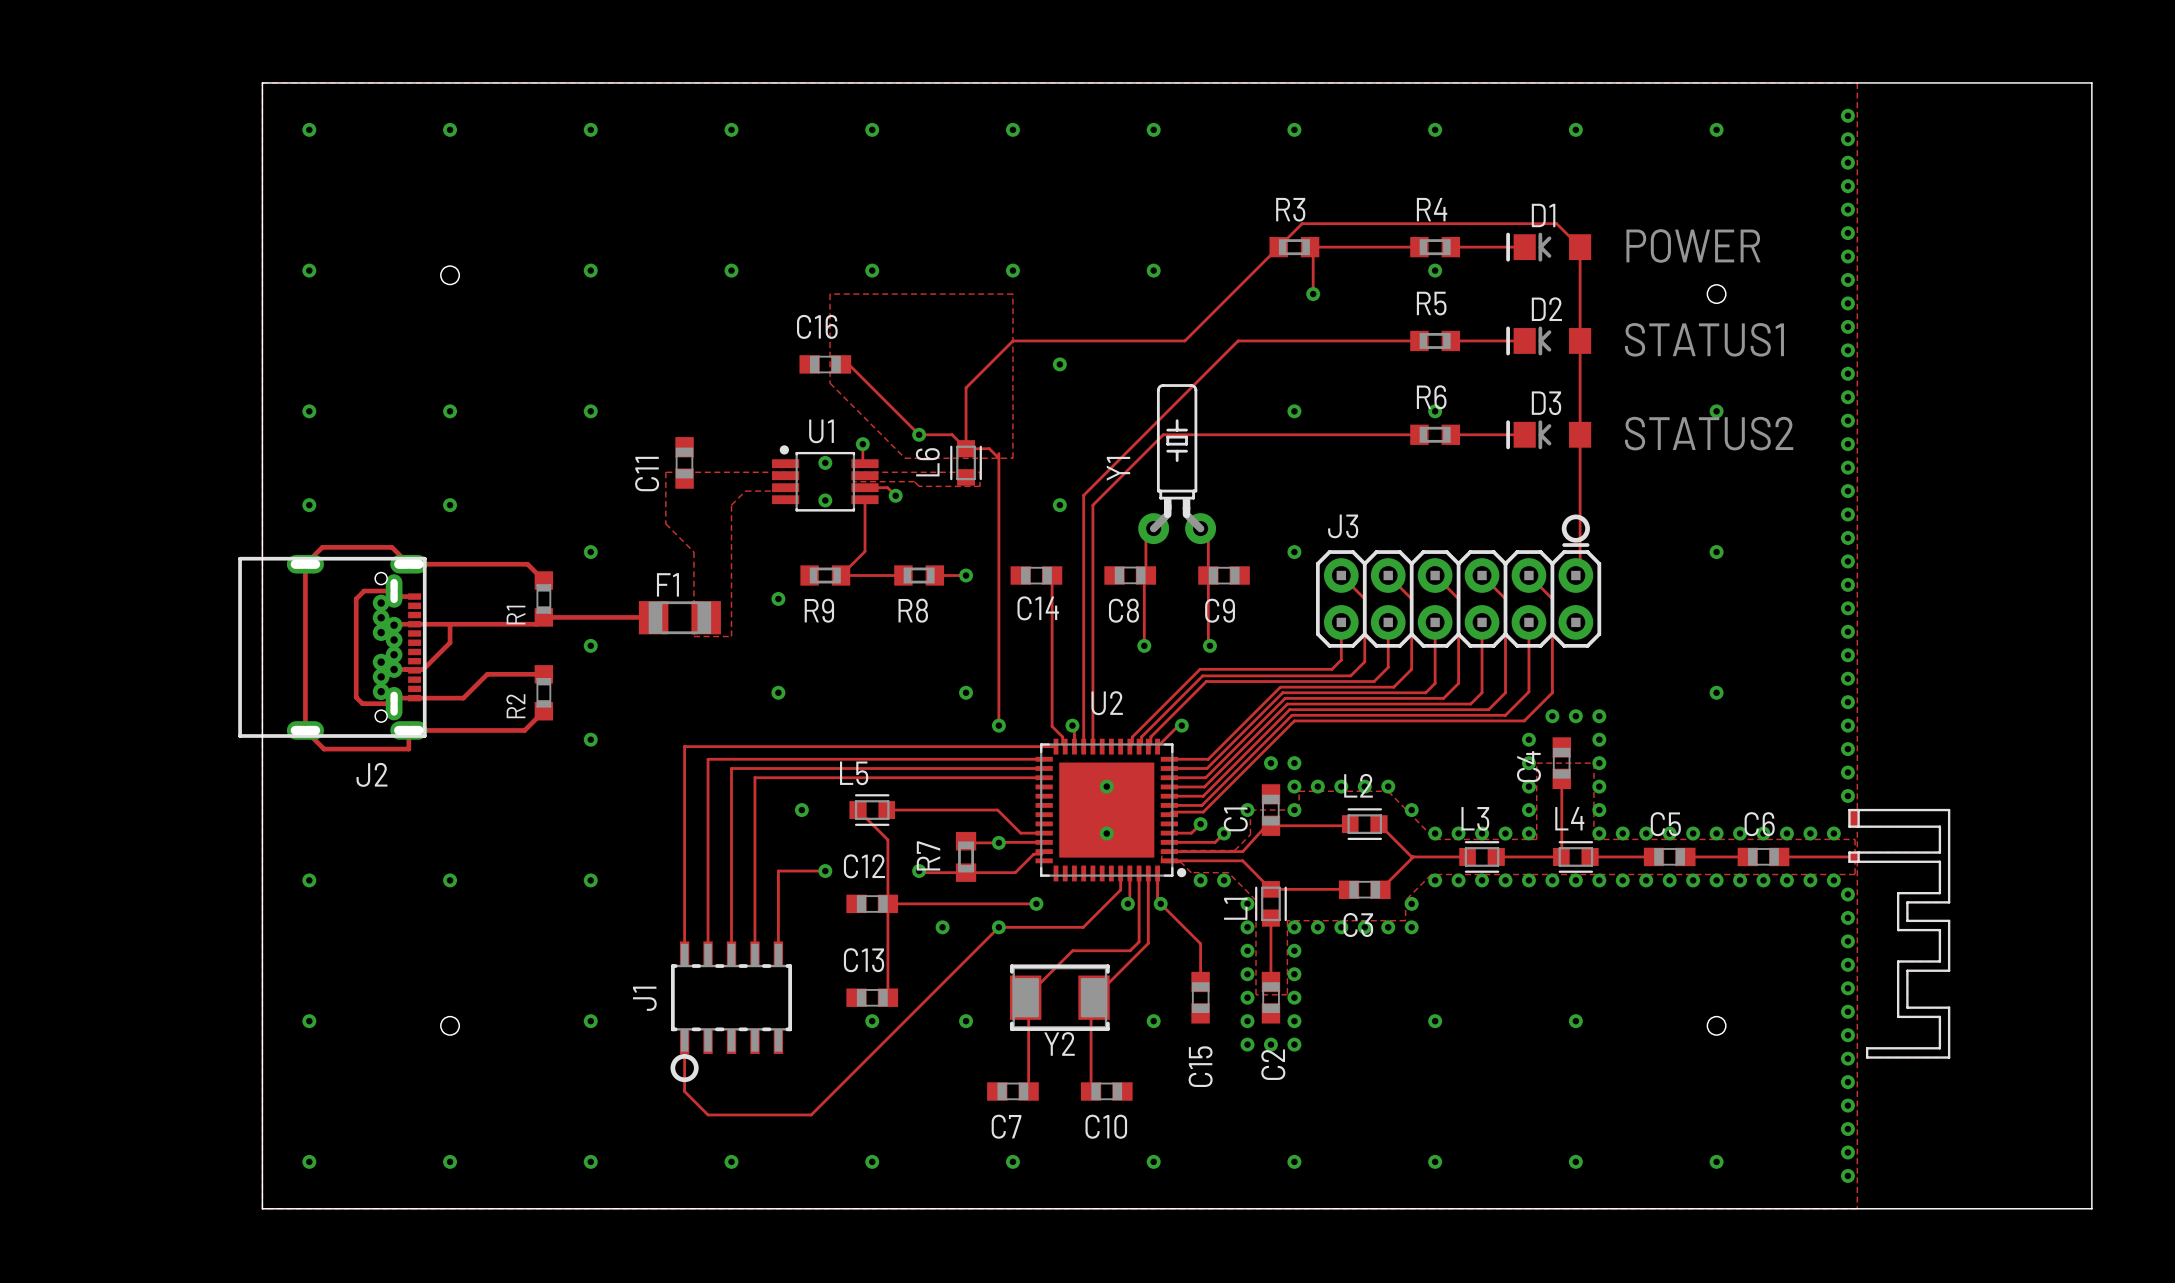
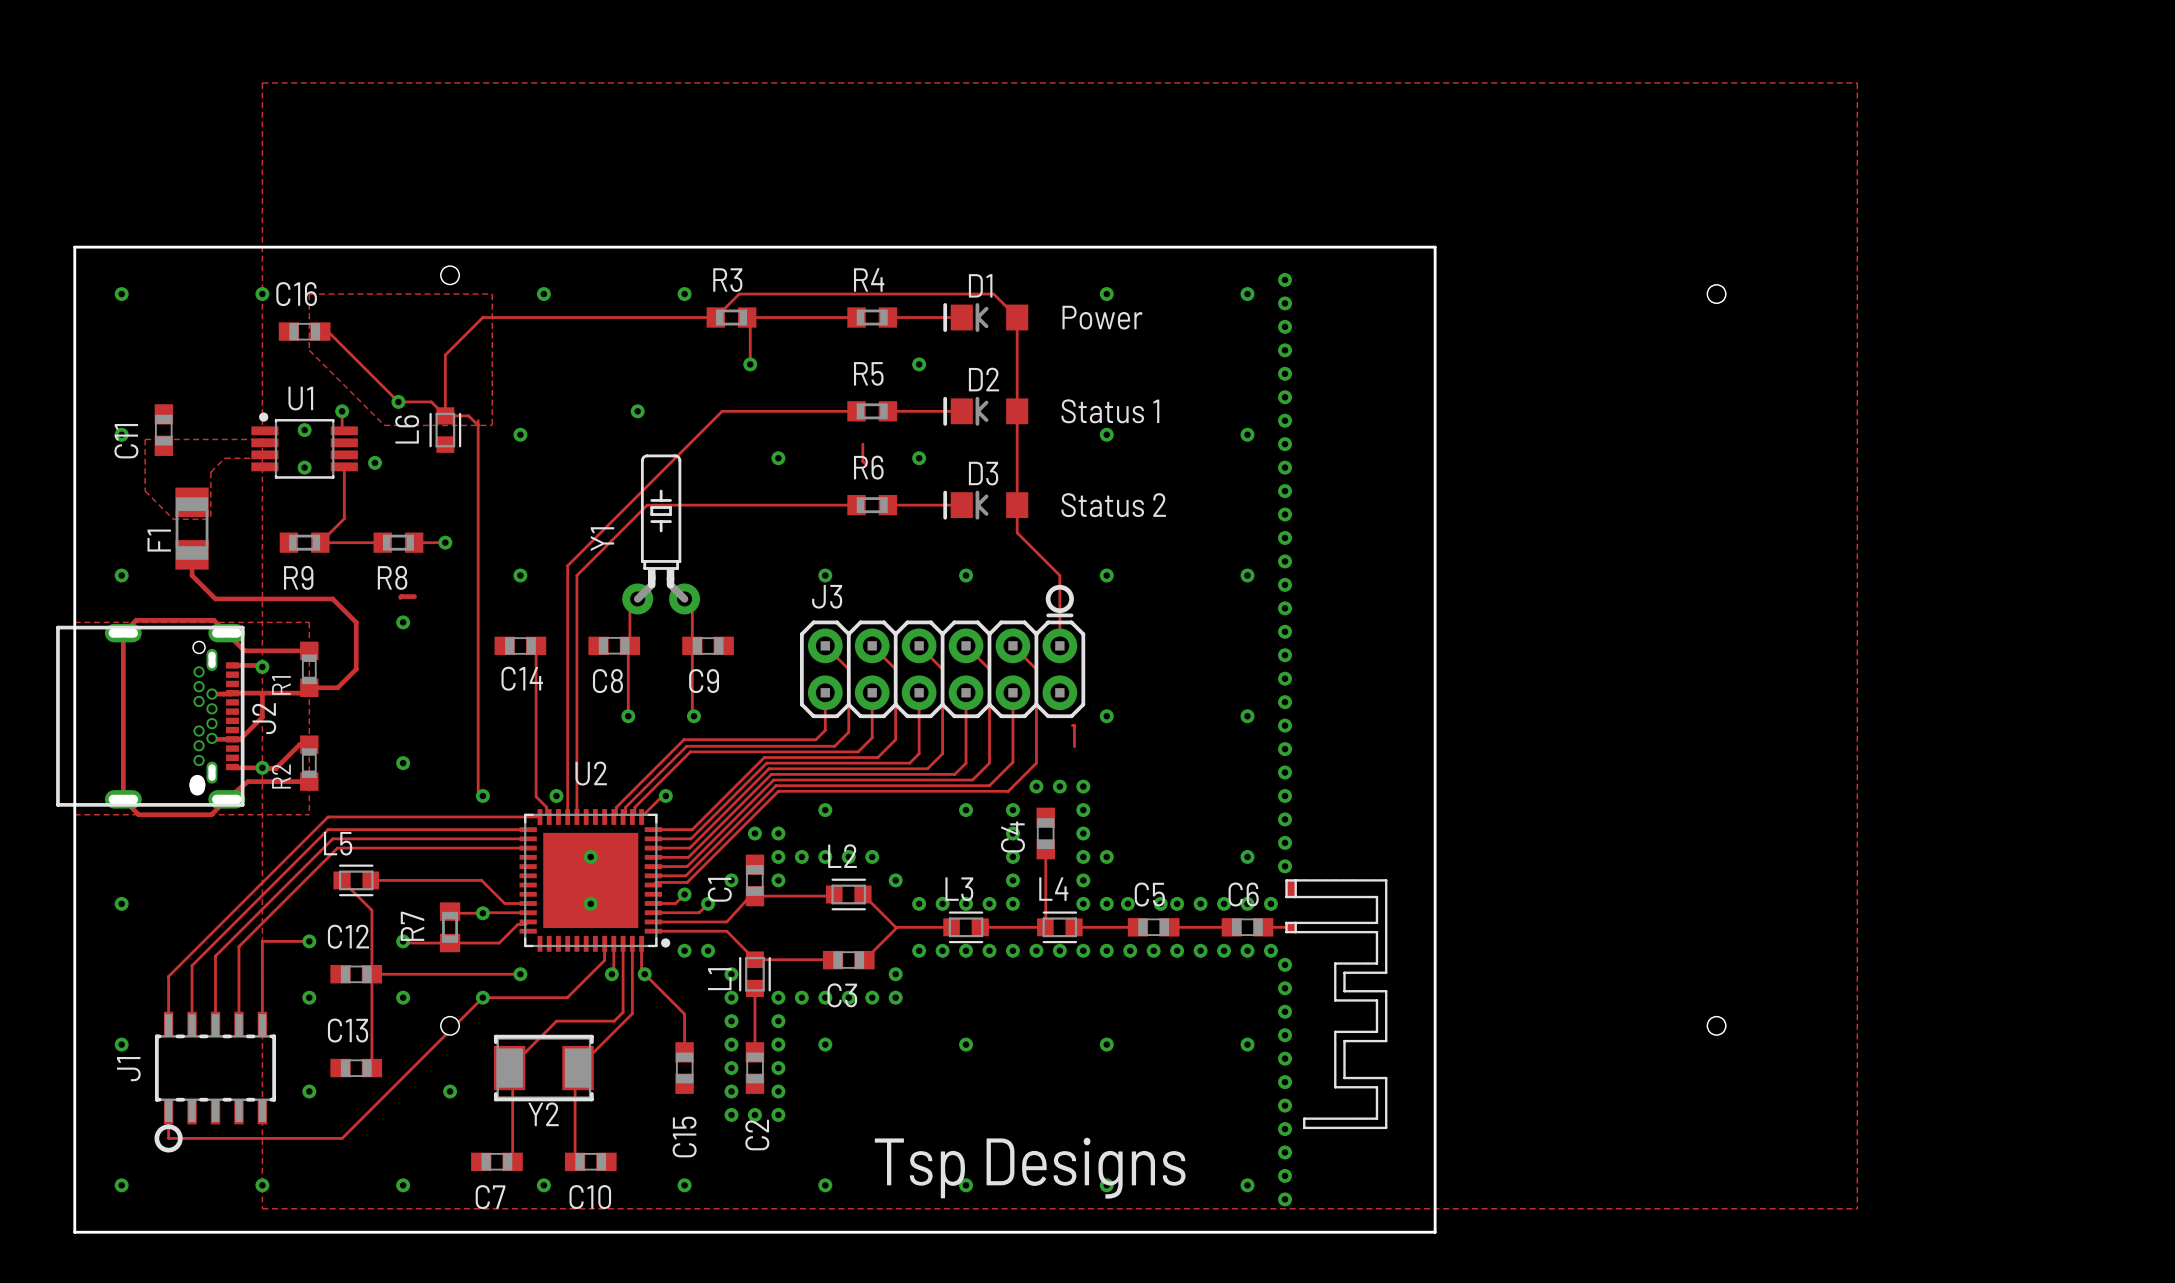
board edge: (262, 82) (2091, 82) (2091, 1208) (262, 1208) (262, 82) -> none
via: (1847, 115) -> none
via: (309, 129) -> none
via: (450, 129) -> none
via: (590, 129) -> none
via: (731, 129) -> none
via: (872, 129) -> none
via: (1012, 129) -> none
via: (1153, 129) -> none
via: (1294, 129) -> none
via: (1435, 129) -> none
via: (1575, 129) -> none
via: (1716, 129) -> none
via: (1847, 139) -> none
via: (1847, 162) -> none
via: (1847, 186) -> none
via: (1847, 209) -> none
via: (1847, 233) -> none
D1 value: POWER (1693, 245) -> none
board edge: none -> (74, 247) (1435, 247) (1435, 1232) (74, 1232) (74, 247)
R3 position: (1294, 247) -> (731, 317)
track: (1419, 247) (1310, 247) (1313, 250) (1313, 294) -> none
R4 position: (1435, 247) -> (872, 317)
track: (1450, 247) (1524, 247) -> none
D1 position: (1548, 247) -> (985, 317)
via: (1847, 256) -> none
via position: (309, 270) -> (262, 294)
via: (590, 270) -> none
via: (731, 270) -> none
via: (872, 270) -> none
via: (1012, 270) -> none
via: (1153, 270) -> none
via: (1435, 270) -> none
via: none -> (1285, 279)
via: (1847, 279) -> none
via: none -> (121, 294)
zone outline: none -> (309, 294) (309, 350) (384, 425) (492, 425) (492, 294) (309, 294)
via: none -> (543, 294)
via: none -> (684, 294)
zone outline: (830, 294) (830, 383) (905, 458) (1012, 458) (1012, 294) (830, 294) -> none
via: none -> (1106, 294)
via: none -> (1247, 294)
via: (1313, 294) -> none
via: none -> (1285, 303)
via: (1847, 303) -> none
track: none -> (856, 317) (747, 317) (750, 320) (750, 364)
track: none -> (887, 317) (961, 317)
text: none -> Power (1102, 317)
via: none -> (1285, 326)
via: (1847, 326) -> none
track: none -> (320, 331) (328, 331) (398, 401) (431, 401) (445, 415)
D2 value: STATUS1 (1704, 339) -> none
track: (1419, 340) (1238, 340) (1083, 495) (1083, 746) -> none
R5 position: (1435, 340) -> (872, 411)
track: (1450, 340) (1524, 340) -> none
D2 position: (1548, 340) -> (985, 411)
via: none -> (1285, 350)
via: (1847, 350) -> none
via: none -> (750, 364)
C16 position: (825, 364) -> (304, 331)
track: (841, 364) (848, 364) (919, 434) (952, 434) (966, 448) -> none
via: none -> (919, 364)
via: (1059, 364) -> none
via: none -> (1285, 373)
via: (1847, 373) -> none
via: none -> (1285, 397)
via: (1847, 397) -> none
via: none -> (398, 401)
via: (309, 411) -> none
track: none -> (342, 411) (342, 428) (344, 430)
via: none -> (342, 411)
via: (450, 411) -> none
via: (590, 411) -> none
via: none -> (637, 411)
track: none -> (856, 411) (722, 411) (567, 565) (567, 816)
track: none -> (887, 411) (961, 411)
text: none -> Status 1 (1110, 411)
via position: (1294, 411) -> (1285, 420)
via: (1435, 411) -> none
via: (1716, 411) -> none
track: none -> (445, 415) (468, 415) (478, 425)
track: none -> (445, 415) (445, 355) (482, 317) (715, 317) (739, 294) (993, 294) (1017, 317) (1017, 532) (1059, 575) (1059, 645)
track: none -> (478, 420) (478, 791) (482, 795)
via: (1847, 420) -> none
via: none -> (304, 430)
D3 value: STATUS2 (1709, 433) -> none
via: none -> (121, 434)
via: none -> (520, 434)
via: (919, 434) -> none
via: none -> (1106, 434)
via: none -> (1247, 434)
track: (1419, 434) (1163, 434) (1092, 505) (1092, 746) -> none
R6 position: (1435, 434) -> (872, 505)
track: (1450, 434) (1524, 434) -> none
D3 position: (1548, 434) -> (985, 505)
zone outline: none -> (145, 439) (145, 491) (173, 519) (210, 519) (210, 472) (224, 458) (276, 458) (276, 439) (145, 439)
via: (862, 444) -> none
via: none -> (1285, 444)
via: (1847, 444) -> none
track: (966, 448) (966, 387) (1012, 340) (1184, 340) (1302, 223) (1556, 223) (1580, 247) (1580, 571) (1575, 575) -> none
track: (966, 448) (989, 448) (998, 458) -> none
track: (998, 453) (998, 725) -> none
via: none -> (778, 458)
via: none -> (919, 458)
via: none -> (374, 462)
C11 position: (684, 462) -> (163, 430)
via: (825, 462) -> none
L6 position: (966, 462) -> (445, 430)
Y1 position: (1177, 464) -> (661, 534)
track: none -> (344, 466) (344, 518) (320, 542) (382, 542)
via: none -> (304, 467)
via: none -> (1285, 467)
via: (1847, 467) -> none
zone outline: (665, 472) (797, 472) (797, 491) (745, 491) (731, 505) (731, 636) (693, 636) (693, 552) (665, 523) (665, 472) -> none
zone outline: (853, 472) (980, 472) (980, 486) (919, 486) (914, 481) (853, 481) (853, 472) -> none
U1 position: (825, 478) -> (304, 445)
track: (865, 487) (887, 487) (895, 495) -> none
via: none -> (1285, 491)
via: (1847, 491) -> none
via: (895, 495) -> none
track: (865, 499) (865, 551) (841, 575) (903, 575) -> none
via: (825, 500) -> none
via: (309, 505) -> none
via position: (450, 505) -> (445, 542)
track: none -> (856, 505) (647, 505) (576, 575) (576, 816)
track: none -> (887, 505) (961, 505)
via: (1059, 505) -> none
text: none -> Status 2 (1113, 505)
via: none -> (1285, 514)
drawing: [1561, 514, 1590, 543] -> none
via: (1847, 514) -> none
track: (1153, 528) (1145, 536) (1144, 645) -> none
track: (1200, 528) (1208, 536) (1208, 644) (1209, 645) -> none
via: none -> (1285, 537)
via: (1847, 537) -> none
track: none -> (414, 542) (445, 542)
via: (590, 552) -> none
via position: (1294, 552) -> (1285, 561)
via: (1716, 552) -> none
J2 footprint: [238, 554, 428, 740] -> [56, 623, 246, 809]
via: (1847, 561) -> none
via: none -> (121, 575)
via: none -> (520, 575)
R9 position: (825, 575) -> (304, 542)
via: none -> (825, 575)
R8 position: (919, 575) -> (398, 542)
track: (934, 575) (966, 575) -> none
C14 position: (1036, 575) -> (520, 645)
track: (1052, 575) (1052, 726) (1062, 736) (1062, 744) (1065, 746) -> none
via: none -> (1106, 575)
C8 position: (1130, 575) -> (614, 645)
C9 position: (1224, 575) -> (708, 645)
via: none -> (1247, 575)
track: (1341, 575) (1364, 598) (1364, 661) (1350, 675) (1202, 675) (1141, 736) (1141, 744) (1139, 746) -> none
track: (1388, 575) (1411, 598) (1411, 669) (1393, 687) (1280, 687) (1208, 759) (1169, 759) -> none
track: (1435, 575) (1458, 598) (1458, 683) (1443, 698) (1285, 698) (1205, 777) (1169, 777) -> none
track: (1482, 575) (1505, 598) (1505, 692) (1488, 709) (1289, 709) (1203, 796) (1169, 796) -> none
track: (1528, 575) (1552, 598) (1552, 692) (1524, 720) (1294, 720) (1203, 812) (1171, 812) (1169, 814) -> none
track: (543, 580) (527, 564) (408, 564) (391, 547) (322, 547) (305, 564) (305, 730) (324, 749) (408, 749) (408, 730) (524, 730) (543, 711) -> none
F1 name position: F1 (667, 584) -> F1 (159, 540)
drawing: none -> [1045, 584, 1074, 614]
via: none -> (1285, 584)
via: (1847, 584) -> none
track: (394, 591) (364, 591) (356, 598) (356, 622) -> (192, 554) (192, 575) (215, 598) (332, 598) (356, 622)
J3 position: (1458, 595) -> (942, 665)
R1 position: (543, 598) -> (309, 669)
track: none -> (637, 598) (629, 606) (628, 716)
track: none -> (684, 598) (692, 606) (692, 714) (693, 716)
via: (778, 598) -> none
via: none -> (1285, 608)
via: (1847, 608) -> none
track: (653, 617) (543, 617) (537, 624) (394, 625) -> none
F1 rotation: 0° (679, 617) -> 90° clockwise (192, 528)
F1 position: (679, 617) -> (192, 528)
zone outline: none -> (74, 622) (309, 622) (309, 814) (74, 814)
via: none -> (403, 622)
track: (1341, 622) (1341, 659) (1331, 669) (1200, 669) (1132, 736) (1132, 744) (1129, 746) -> none
track: (1388, 622) (1388, 667) (1374, 681) (1206, 681) (1150, 736) (1150, 744) (1148, 746) -> none
track: (1435, 622) (1435, 683) (1425, 692) (1282, 692) (1207, 768) (1169, 768) -> none
track: (1482, 622) (1482, 692) (1470, 704) (1287, 704) (1204, 786) (1169, 786) -> none
track: (1528, 622) (1528, 691) (1505, 715) (1292, 715) (1201, 805) (1169, 805) -> none
track: (450, 624) (450, 642) (423, 669) (394, 669) -> none
via: none -> (1285, 631)
via: (1847, 631) -> none
track: none -> (536, 645) (536, 796) (546, 807) (546, 814) (549, 816)
via: (590, 645) -> none
track: none -> (825, 645) (848, 669) (848, 732) (834, 746) (686, 746) (625, 807) (625, 814) (623, 816)
track: none -> (872, 645) (895, 669) (895, 739) (877, 757) (764, 757) (692, 829) (653, 829)
track: none -> (919, 645) (942, 669) (942, 753) (927, 768) (769, 768) (689, 848) (653, 848)
track: none -> (966, 645) (989, 669) (989, 763) (972, 780) (773, 780) (687, 866) (653, 866)
track: none -> (1012, 645) (1036, 669) (1036, 763) (1008, 791) (778, 791) (687, 882) (655, 882) (653, 885)
via: (1144, 645) -> none
via: (1209, 645) -> none
track: none -> (309, 650) (244, 650) (213, 620) (136, 620) (123, 633) (123, 799) (138, 814) (211, 814) (247, 781) (309, 781)
via: none -> (1285, 655)
via: (1847, 655) -> none
track: none -> (232, 665) (262, 666)
via: none -> (262, 666)
track: (356, 669) (356, 697) (362, 703) (394, 703) -> (356, 669) (337, 687) (309, 687) (303, 693) (211, 694)
track: (543, 674) (487, 674) (463, 698) (400, 697) -> none
via: none -> (1285, 678)
via: (1847, 678) -> none
R2 position: (543, 692) -> (309, 763)
via: (778, 692) -> none
track: none -> (825, 692) (825, 730) (815, 739) (684, 739) (616, 807) (616, 814) (613, 816)
track: none -> (872, 692) (872, 737) (858, 751) (690, 751) (634, 807) (634, 814) (632, 816)
track: none -> (919, 692) (919, 753) (909, 763) (766, 763) (691, 838) (653, 838)
track: none -> (966, 692) (966, 763) (954, 774) (771, 774) (688, 857) (653, 857)
via: (966, 692) -> none
track: none -> (1012, 692) (1012, 762) (989, 785) (776, 785) (685, 875) (653, 875)
via: (1716, 692) -> none
track: none -> (260, 693) (262, 717) (240, 739) (211, 738)
via: none -> (1285, 702)
via: (1847, 702) -> none
via: none -> (628, 716)
via: none -> (693, 716)
via: none -> (1106, 716)
via: none -> (1247, 716)
via: (1552, 716) -> none
via: (1575, 716) -> none
via: (1599, 716) -> none
via: (998, 725) -> none
via: (1072, 725) -> none
track: (1181, 725) (1178, 725) (1157, 746) -> none
via: (1181, 725) -> none
via: none -> (1285, 725)
via: (1847, 725) -> none
via: (590, 739) -> none
via: (1528, 739) -> none
via: (1599, 739) -> none
track: none -> (309, 744) (299, 744) (275, 768) (232, 767)
track: (1055, 746) (684, 746) (684, 953) -> none
via: none -> (1285, 749)
via: (1847, 749) -> none
track: (1044, 759) (708, 759) (708, 953) -> none
via: none -> (403, 763)
via: (1270, 763) -> none
via position: (1294, 763) -> (1285, 772)
via: (1528, 763) -> none
zone outline: (1536, 763) (1536, 839) (1435, 839) (1388, 791) (1299, 791) (1299, 810) (1250, 810) (1250, 834) (1234, 850) (1161, 850) (1161, 861) (1181, 862) (1191, 872) (1228, 872) (1255, 900) (1255, 994) (1287, 994) (1287, 920) (1405, 920) (1405, 900) (1431, 874) (1855, 874) (1855, 839) (1593, 839) (1593, 763) (1536, 763) -> none
C4 position: (1561, 763) -> (1045, 833)
via: (1599, 763) -> none
via: none -> (262, 767)
track: (1044, 768) (731, 768) (731, 953) -> none
via: (1847, 772) -> none
J2 name position: J2 (371, 774) -> J2 (264, 718)
track: (1044, 777) (754, 777) (754, 953) -> none
track: (1561, 778) (1561, 856) (1496, 856) -> none
via: none -> (1036, 786)
via: none -> (1059, 786)
via: none -> (1083, 786)
via: (1106, 786) -> none
via position: (1294, 786) -> (1285, 795)
via: (1317, 786) -> none
via: (1341, 786) -> none
via: (1364, 786) -> none
via: (1388, 786) -> none
via: (1528, 786) -> none
via: (1599, 786) -> none
via: none -> (482, 795)
via: none -> (556, 795)
track: none -> (665, 795) (662, 795) (641, 816)
via: none -> (665, 795)
via: (1847, 795) -> none
via: (801, 810) -> none
via: none -> (825, 810)
track: (858, 810) (887, 839) (887, 997) -> none
L5 position: (872, 810) -> (356, 880)
track: (886, 810) (997, 810) (1020, 833) (1044, 833) -> none
via: none -> (966, 810)
via: none -> (1012, 810)
via: none -> (1083, 810)
U2 position: (1110, 810) -> (594, 880)
via: (1247, 810) -> none
C1 position: (1270, 810) -> (754, 880)
via position: (1294, 810) -> (1285, 819)
via: (1411, 810) -> none
via: (1528, 810) -> none
via: (1599, 810) -> none
track: none -> (539, 816) (328, 816) (168, 976) (168, 1023)
track: (1200, 824) (1191, 833) (1169, 833) -> none
via: (1200, 824) -> none
track: (1350, 824) (1348, 825) (1266, 825) (1242, 851) (1169, 851) -> none
L2 position: (1364, 824) -> (848, 894)
track: (1378, 824) (1411, 856) (1467, 856) -> none
track: none -> (528, 829) (328, 829) (192, 965) (192, 1023)
via: none -> (754, 833)
via: none -> (778, 833)
via: none -> (1012, 833)
via: none -> (1083, 833)
via: (1106, 833) -> none
track: (1224, 833) (1215, 842) (1169, 842) -> none
via: (1224, 833) -> none
via: (1435, 833) -> none
via: (1458, 833) -> none
via: (1482, 833) -> none
via: (1505, 833) -> none
via: (1528, 833) -> none
via: (1599, 833) -> none
via: (1622, 833) -> none
via: (1646, 833) -> none
via: (1669, 833) -> none
via: (1693, 833) -> none
via: (1716, 833) -> none
via: (1740, 833) -> none
via: (1763, 833) -> none
via: (1786, 833) -> none
via: (1810, 833) -> none
via: (1833, 833) -> none
track: none -> (528, 838) (332, 838) (215, 956) (215, 1023)
track: (966, 841) (966, 842) (1044, 842) -> none
via: (998, 842) -> none
via: none -> (1285, 842)
track: none -> (528, 848) (337, 848) (238, 946) (238, 1023)
track: (1044, 851) (1041, 854) (1033, 854) (1015, 872) (920, 872) (919, 871) -> none
via: none -> (590, 856)
via: none -> (778, 856)
via: none -> (801, 856)
via: none -> (825, 856)
via: none -> (848, 856)
via: none -> (872, 856)
R7 position: (966, 856) -> (450, 927)
via: none -> (1012, 856)
via: none -> (1083, 856)
via: none -> (1106, 856)
via: none -> (1247, 856)
track: (1413, 856) (1380, 889) -> none
L3 position: (1482, 856) -> (966, 927)
L4 position: (1575, 856) -> (1059, 927)
track: (1590, 856) (1653, 856) -> none
C5 position: (1669, 856) -> (1153, 927)
track: (1685, 856) (1747, 856) -> none
C6 position: (1763, 856) -> (1247, 927)
track: (1779, 856) (1854, 857) -> none
track: (1169, 860) (1242, 860) (1270, 889) (1349, 889) -> none
via: none -> (1285, 866)
track: (825, 871) (778, 871) (778, 953) -> none
via: (825, 871) -> none
via: (919, 871) -> none
track: (1120, 873) (1120, 890) (1083, 927) -> (1137, 927) (1083, 927)
track: (1129, 873) (1129, 901) (1127, 903) -> none
track: (1139, 873) (1139, 941) (1130, 950) (1072, 950) (1025, 997) (1028, 1000) (1028, 1091) -> none
track: (1148, 873) (1148, 943) (1091, 1000) (1091, 1091) -> none
track: (1157, 873) (1157, 898) (1160, 903) (1200, 943) (1200, 981) -> none
via: (309, 880) -> none
track: none -> (342, 880) (371, 910) (371, 1068)
track: none -> (370, 880) (481, 880) (504, 903) (528, 903)
via: (450, 880) -> none
via: (590, 880) -> none
via: none -> (731, 880)
via: none -> (778, 880)
via: none -> (895, 880)
via: none -> (1012, 880)
via: none -> (1083, 880)
via: (1200, 880) -> none
via: (1224, 880) -> none
via: (1435, 880) -> none
via: (1458, 880) -> none
via: (1482, 880) -> none
via: (1505, 880) -> none
via: (1528, 880) -> none
via: (1552, 880) -> none
via: (1575, 880) -> none
via: (1599, 880) -> none
via: (1622, 880) -> none
via: (1646, 880) -> none
via: (1669, 880) -> none
via: (1693, 880) -> none
via: (1716, 880) -> none
via: (1740, 880) -> none
via: (1763, 880) -> none
via: (1786, 880) -> none
via: (1810, 880) -> none
via: (1833, 880) -> none
C3 position: (1364, 889) -> (848, 960)
track: none -> (684, 894) (675, 903) (653, 903)
via: none -> (684, 894)
track: none -> (834, 894) (832, 896) (750, 896) (726, 921) (653, 921)
track: none -> (862, 894) (895, 927) (951, 927)
via: (1847, 894) -> none
via: none -> (121, 903)
via: none -> (590, 903)
track: none -> (708, 903) (699, 912) (653, 912)
via: none -> (708, 903)
C12 position: (872, 903) -> (356, 974)
track: (887, 903) (1036, 903) -> none
via: none -> (919, 903)
via: none -> (942, 903)
via: none -> (966, 903)
via: none -> (989, 903)
via: none -> (1012, 903)
via: (1036, 903) -> none
via: none -> (1083, 903)
via: none -> (1106, 903)
via: none -> (1177, 903)
via: none -> (1200, 903)
via: none -> (1224, 903)
L1 position: (1270, 903) -> (754, 974)
via: none -> (1270, 903)
via: (1411, 903) -> none
track: none -> (450, 911) (450, 913) (528, 912)
via: none -> (482, 913)
via: (1847, 917) -> none
track: (1270, 918) (1270, 981) -> none
track: none -> (528, 921) (525, 924) (517, 924) (499, 943) (404, 943) (403, 941)
track: none -> (897, 927) (864, 960)
via: (942, 927) -> none
track: (998, 927) (811, 1114) (708, 1114) (684, 1091) (684, 1052) -> (998, 927) (980, 927)
via: (998, 927) -> none
track: (1045, 927) (1074, 927) -> (1045, 927) (1045, 849)
track: none -> (1169, 927) (1231, 927)
via: (1247, 927) -> none
track: none -> (1263, 927) (1291, 927)
via: (1294, 927) -> none
via: (1317, 927) -> none
via: (1341, 927) -> none
via: (1364, 927) -> none
via: (1388, 927) -> none
via: (1411, 927) -> none
track: none -> (653, 931) (726, 931) (754, 959) (833, 960)
part: (1899, 933) -> none
track: none -> (309, 941) (262, 941) (262, 1023)
via: none -> (309, 941)
via: none -> (403, 941)
via: (1847, 941) -> none
track: none -> (604, 943) (604, 960) (567, 997) (482, 997) (342, 1138) (168, 1138) (168, 1112)
track: none -> (613, 943) (613, 972) (611, 974)
track: none -> (623, 943) (623, 1012) (614, 1021) (556, 1021) (509, 1068) (512, 1071) (512, 1161)
track: none -> (632, 943) (632, 1013) (575, 1071) (575, 1161)
track: none -> (641, 943) (641, 968) (644, 974) (684, 1014) (684, 1042)
via: none -> (684, 950)
via: none -> (708, 950)
via: none -> (919, 950)
via: none -> (942, 950)
via: none -> (966, 950)
via: none -> (989, 950)
via: none -> (1012, 950)
via: none -> (1036, 950)
via: none -> (1059, 950)
via: none -> (1083, 950)
via: none -> (1106, 950)
via: none -> (1130, 950)
via: none -> (1153, 950)
via: none -> (1177, 950)
via: none -> (1200, 950)
via: none -> (1224, 950)
via: none -> (1270, 950)
via: (1294, 950) -> none
via: (1847, 964) -> none
track: none -> (371, 974) (520, 974)
via: none -> (520, 974)
via: none -> (611, 974)
via: none -> (644, 974)
via: none -> (731, 974)
via: none -> (895, 974)
via: (1247, 974) -> none
via position: (1294, 974) -> (1285, 964)
track: none -> (754, 988) (754, 1052)
via: (1847, 988) -> none
via: none -> (403, 997)
via: none -> (482, 997)
J1 position: (731, 997) -> (215, 1068)
via: none -> (731, 997)
via: none -> (778, 997)
via: none -> (801, 997)
via: none -> (825, 997)
via: none -> (848, 997)
C13 position: (872, 997) -> (356, 1068)
via: none -> (872, 997)
via: none -> (895, 997)
Y2 position: (1059, 997) -> (543, 1068)
C15 position: (1200, 997) -> (684, 1068)
via: (1247, 997) -> none
C2 position: (1270, 997) -> (754, 1068)
via position: (1294, 997) -> (1285, 988)
part: none -> (1336, 1004)
via: (1847, 1011) -> none
via position: (309, 1021) -> (309, 997)
via: (590, 1021) -> none
via: none -> (731, 1021)
via: none -> (778, 1021)
via: (872, 1021) -> none
via position: (966, 1021) -> (966, 1044)
via: (1153, 1021) -> none
via: (1247, 1021) -> none
via position: (1294, 1021) -> (1285, 1011)
via: (1435, 1021) -> none
via: (1575, 1021) -> none
via: (1847, 1035) -> none
via: none -> (121, 1044)
via: none -> (731, 1044)
via: none -> (778, 1044)
via: none -> (825, 1044)
via: none -> (1106, 1044)
via: (1270, 1044) -> none
via position: (1294, 1044) -> (1285, 1035)
drawing: [670, 1053, 699, 1083] -> none
via: none -> (1285, 1058)
via: (1847, 1058) -> none
via: none -> (731, 1068)
via: none -> (778, 1068)
via: none -> (1285, 1082)
via: (1847, 1082) -> none
via: none -> (309, 1091)
via: none -> (450, 1091)
via: none -> (731, 1091)
via: none -> (778, 1091)
C7 position: (1012, 1091) -> (496, 1161)
C10 position: (1106, 1091) -> (590, 1161)
via: none -> (1285, 1105)
via: (1847, 1105) -> none
via: none -> (731, 1114)
via: none -> (754, 1114)
via: none -> (778, 1114)
drawing: none -> [154, 1124, 183, 1153]
via: none -> (1285, 1129)
via: (1847, 1129) -> none
via: (1847, 1152) -> none
via: (309, 1161) -> none
via: (450, 1161) -> none
via: (590, 1161) -> none
via: (731, 1161) -> none
via: (872, 1161) -> none
via: (1012, 1161) -> none
via: (1153, 1161) -> none
via position: (1294, 1161) -> (1285, 1152)
via: (1435, 1161) -> none
via: (1575, 1161) -> none
via: (1716, 1161) -> none
text: none -> Tsp Designs (1030, 1168)
via: none -> (1285, 1175)
via: (1847, 1175) -> none
via: none -> (121, 1185)
via: none -> (262, 1185)
via: none -> (403, 1185)
via: none -> (543, 1185)
via: none -> (684, 1185)
via: none -> (825, 1185)
via: none -> (966, 1185)
via: none -> (1106, 1185)
via: none -> (1247, 1185)
via: none -> (1285, 1199)

